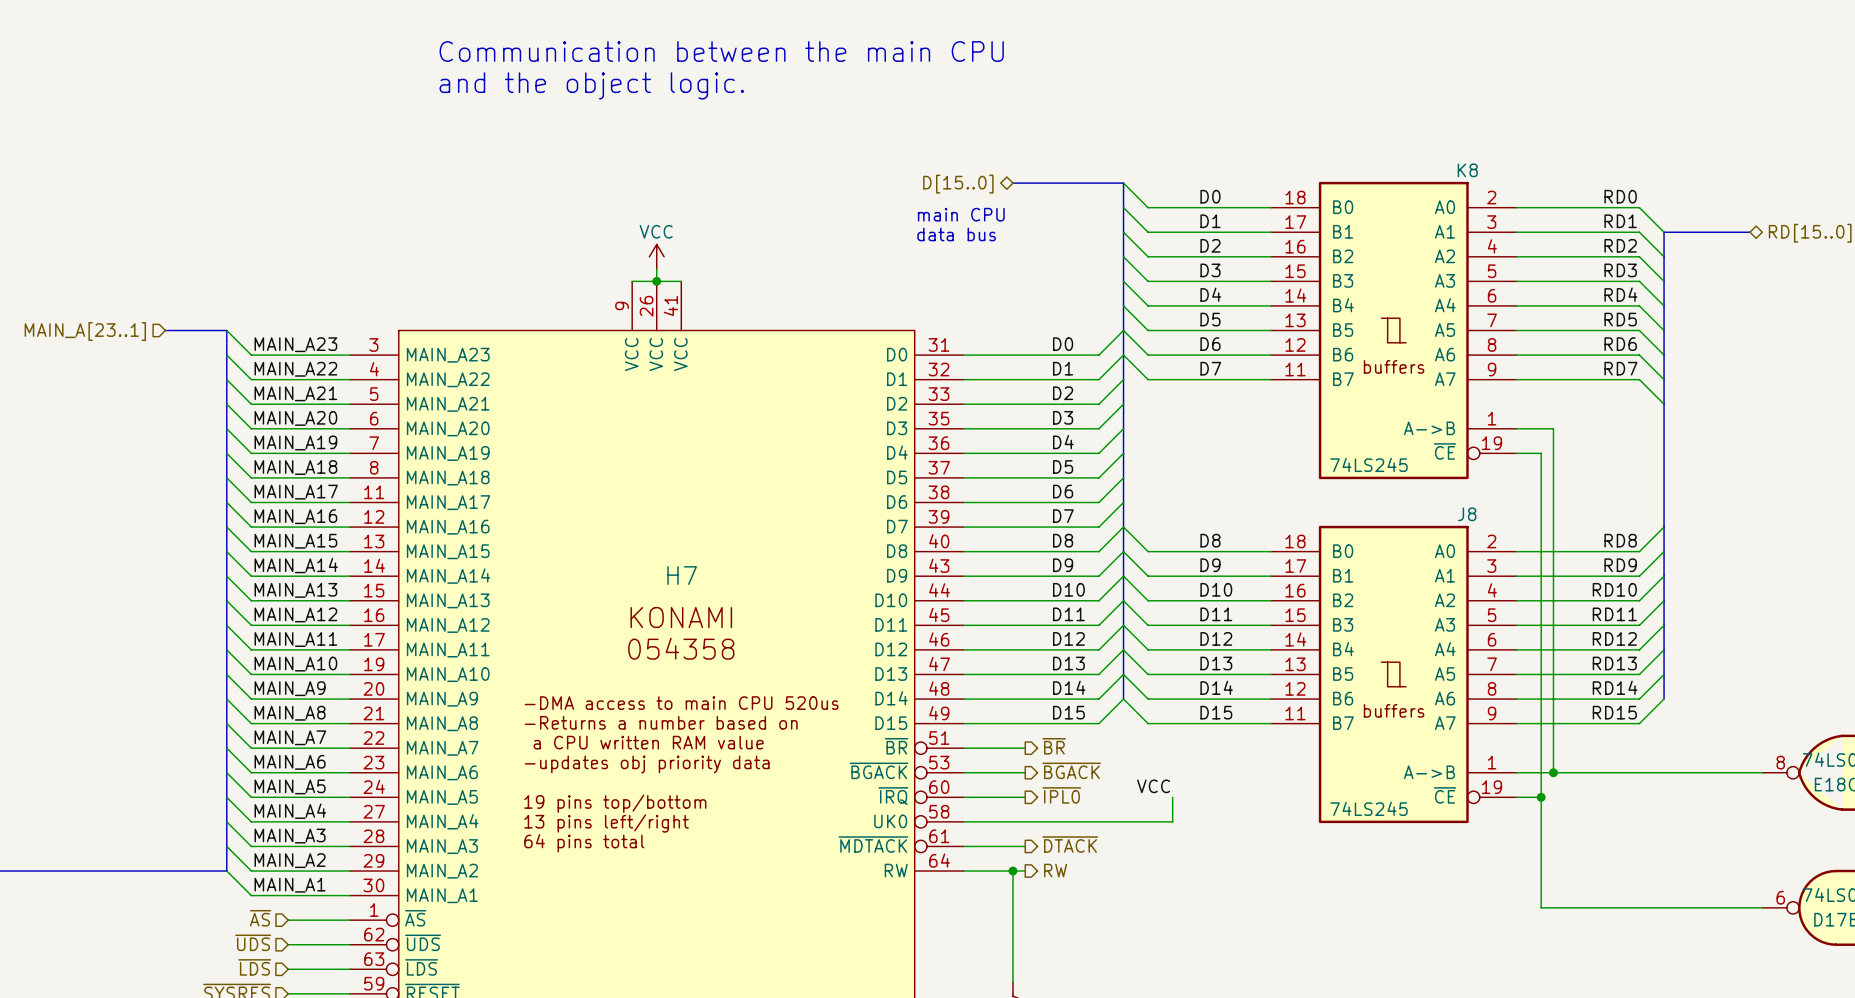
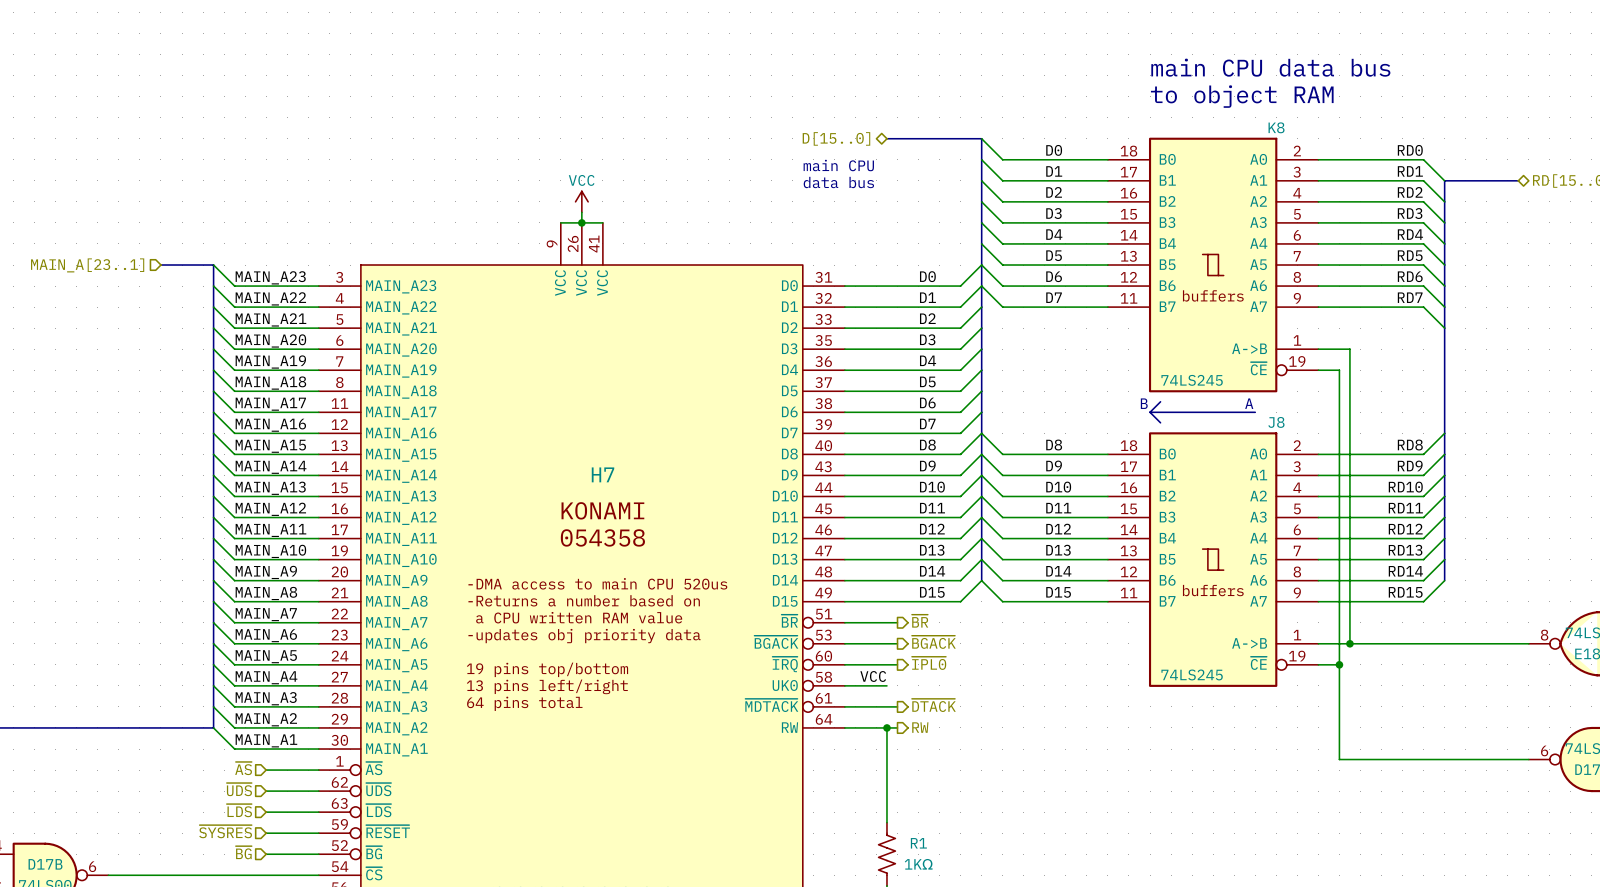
text: Communication between the main CPU (721, 51) -> none
text: and the object logic. (591, 85) -> none
text: none -> main CPU data bus (1270, 67)
text: none -> to object RAM (1242, 96)
line: none -> (1160, 401) (1150, 412)
text: none -> B (1144, 403)
text: none -> A (1249, 403)
line: none -> (1150, 412) (1160, 422)
line: none -> (1150, 412) (1255, 412)
label position: VCC (1153, 786) -> VCC (873, 676)
wire: (1172, 797) (1172, 821) (1012, 821) -> none

